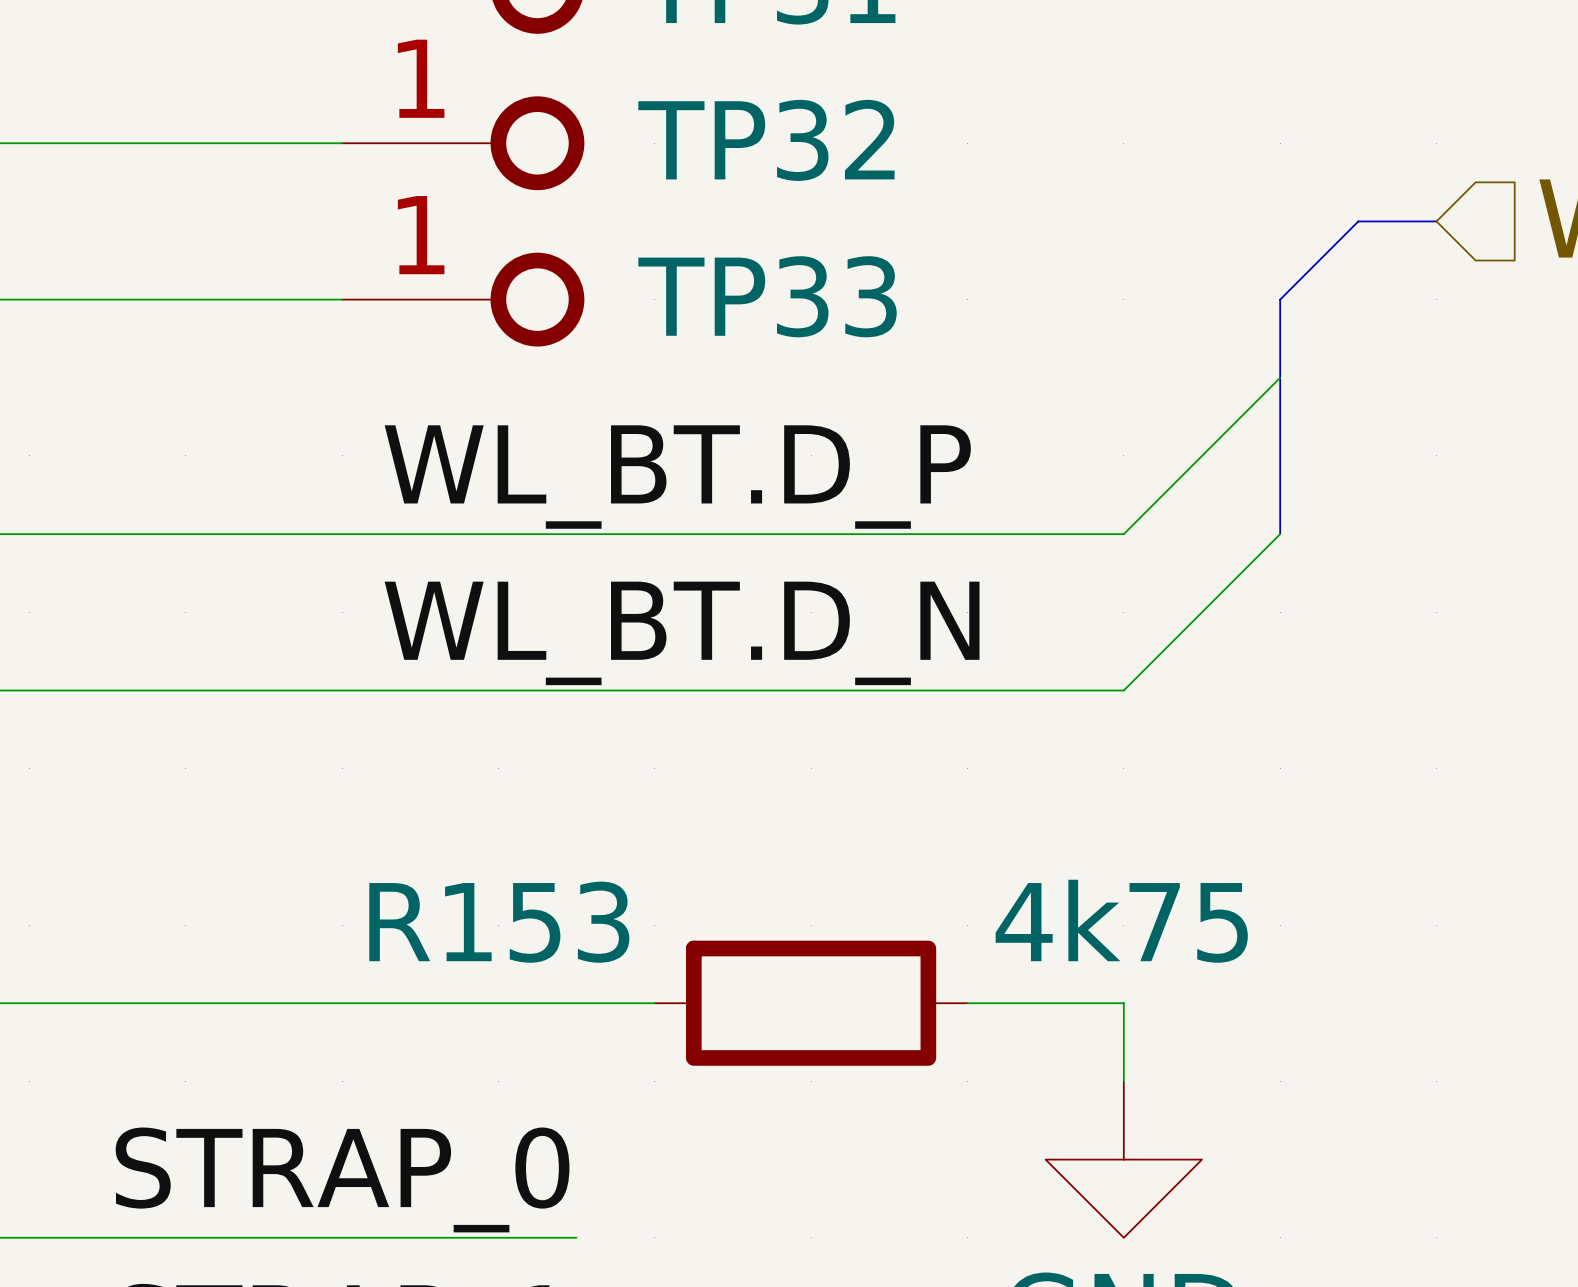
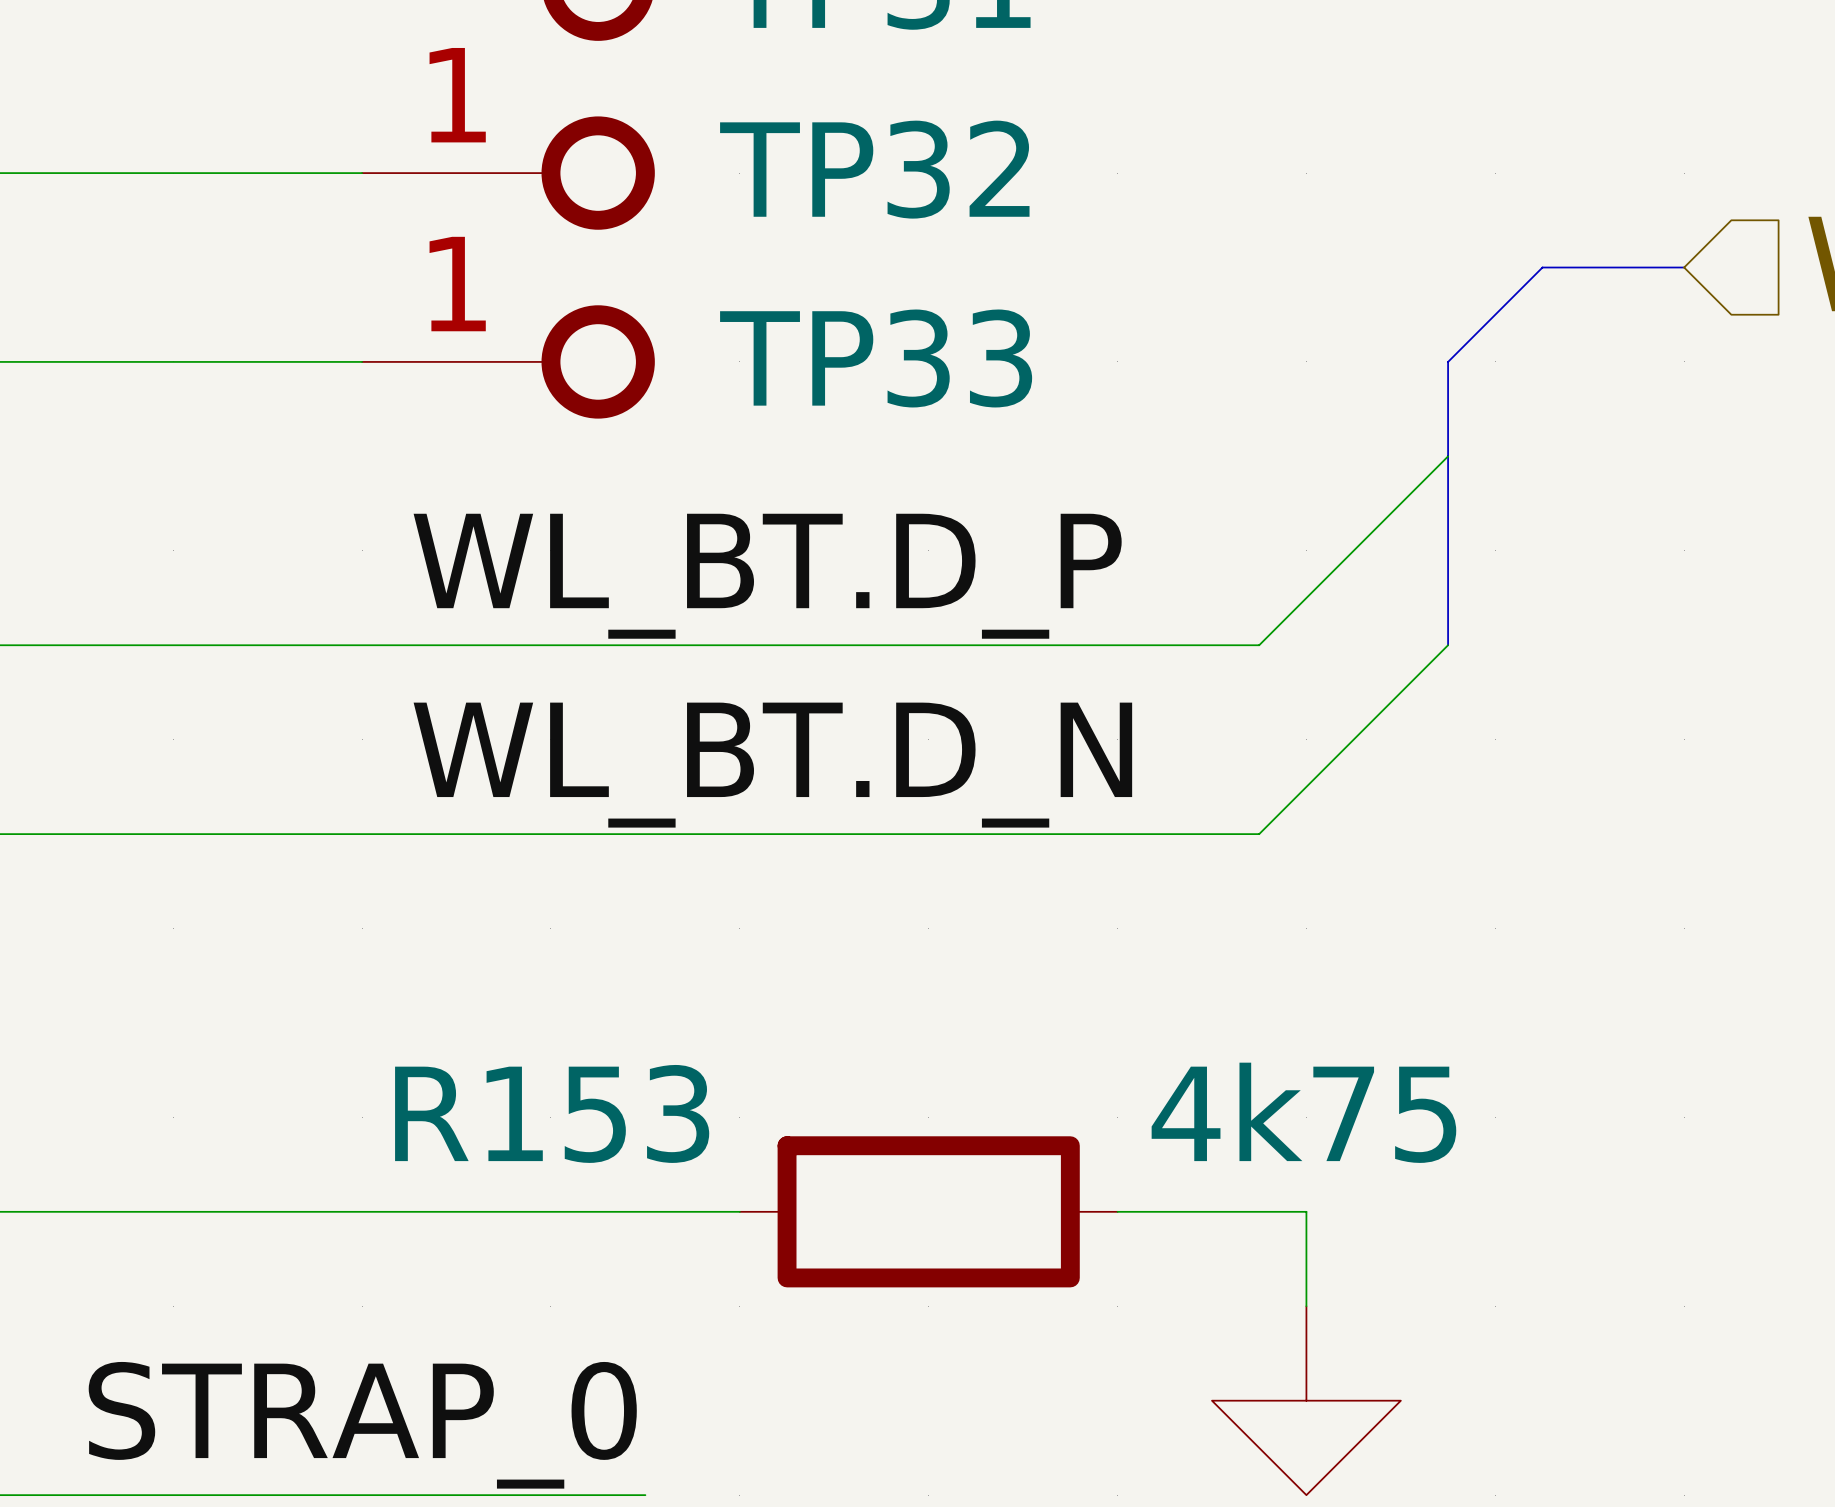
bus: (1358, 221) (1280, 299) (1280, 534) -> (1589, 267) (1542, 267) (1448, 361) (1448, 645)
wire: (1280, 377) (1123, 534) (1084, 534) -> (1448, 456) (1259, 645)
wire: (1280, 534) (1123, 690) (1084, 690) -> (1448, 645) (1259, 834)

